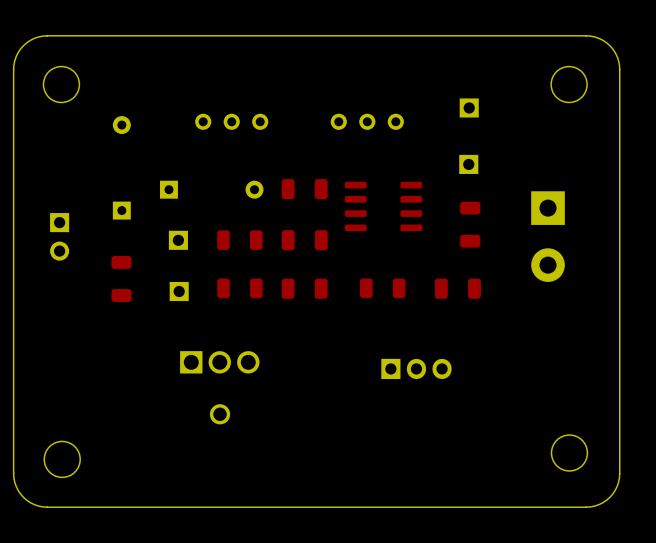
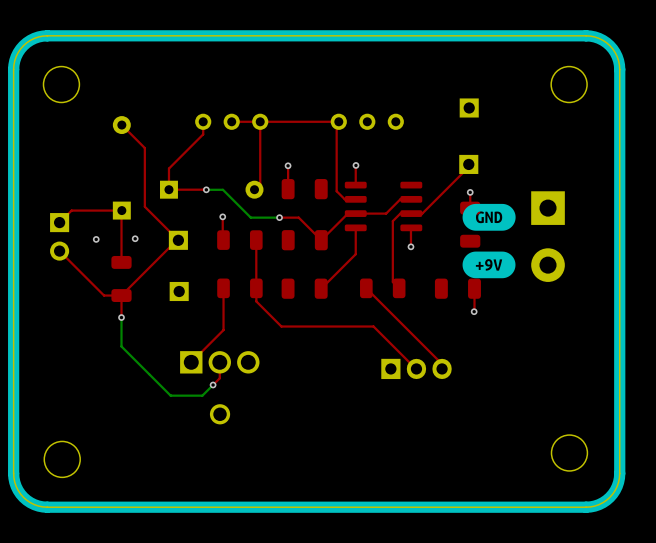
line: none -> (586, 35) (47, 35) (38, 36) (26, 42) (18, 52) (13, 69) (13, 473) (14, 482) (20, 494) (34, 504) (47, 507) (586, 507) (594, 506) (606, 500) (615, 490) (619, 473) (619, 69) (617, 56) (609, 45) (598, 38) (586, 35)
top track: none -> (203, 121) (203, 134) (168, 168) (168, 189) (203, 189)
top track: none -> (231, 121) (338, 121) (335, 124)
top track: none -> (260, 121) (260, 183) (254, 189)
top track: none -> (336, 123) (336, 191) (344, 199) (355, 199)
top track: none -> (121, 125) (144, 148) (144, 206) (178, 240) (121, 295)
top track: none -> (468, 164) (468, 167) (422, 213) (400, 213) (392, 221) (392, 282) (399, 288)
top track: none -> (288, 165) (288, 189)
via: none -> (288, 165)
top track: none -> (355, 165) (355, 185)
via: none -> (355, 165)
bottom track: none -> (206, 189) (222, 189) (250, 217) (279, 217)
via: none -> (206, 189)
top track: none -> (470, 192) (470, 208)
via: none -> (470, 192)
top track: none -> (411, 199) (400, 199) (386, 213) (347, 213) (321, 240) (298, 217) (279, 217)
drawing: none -> [462, 203, 516, 231]
top track: none -> (222, 216) (223, 240)
via: none -> (222, 216)
via: none -> (279, 217)
top track: none -> (59, 222) (71, 210) (121, 210) (121, 262)
top track: none -> (355, 227) (355, 254) (321, 288)
top track: none -> (411, 227) (410, 246)
via: none -> (135, 238)
via: none -> (96, 239)
top track: none -> (256, 240) (256, 288)
via: none -> (410, 246)
top track: none -> (59, 251) (104, 295) (121, 295)
drawing: none -> [462, 251, 516, 279]
top track: none -> (223, 288) (223, 330) (191, 362)
top track: none -> (256, 288) (256, 301) (281, 326) (373, 326) (416, 368)
top track: none -> (366, 288) (442, 364) (442, 368)
top track: none -> (474, 288) (474, 311)
top track: none -> (121, 295) (121, 317)
via: none -> (474, 311)
bottom track: none -> (121, 317) (121, 346) (170, 395) (202, 395) (213, 384)
via: none -> (121, 317)
top track: none -> (219, 362) (219, 378) (213, 384)
via: none -> (213, 384)

